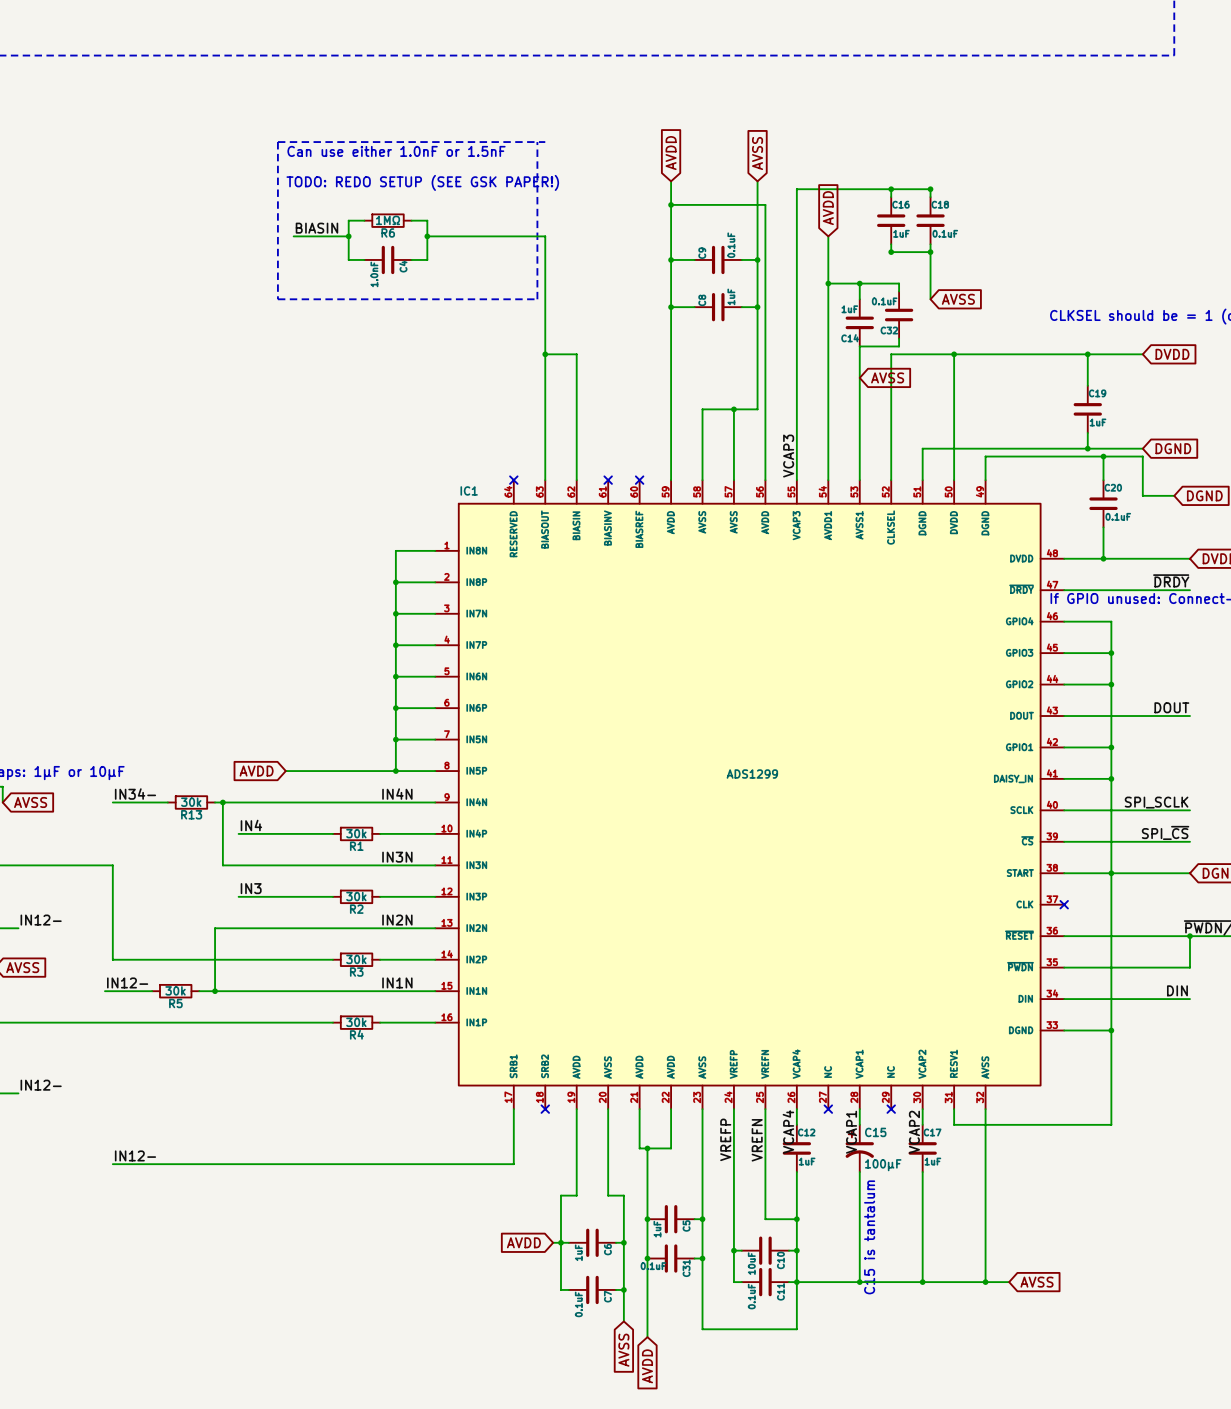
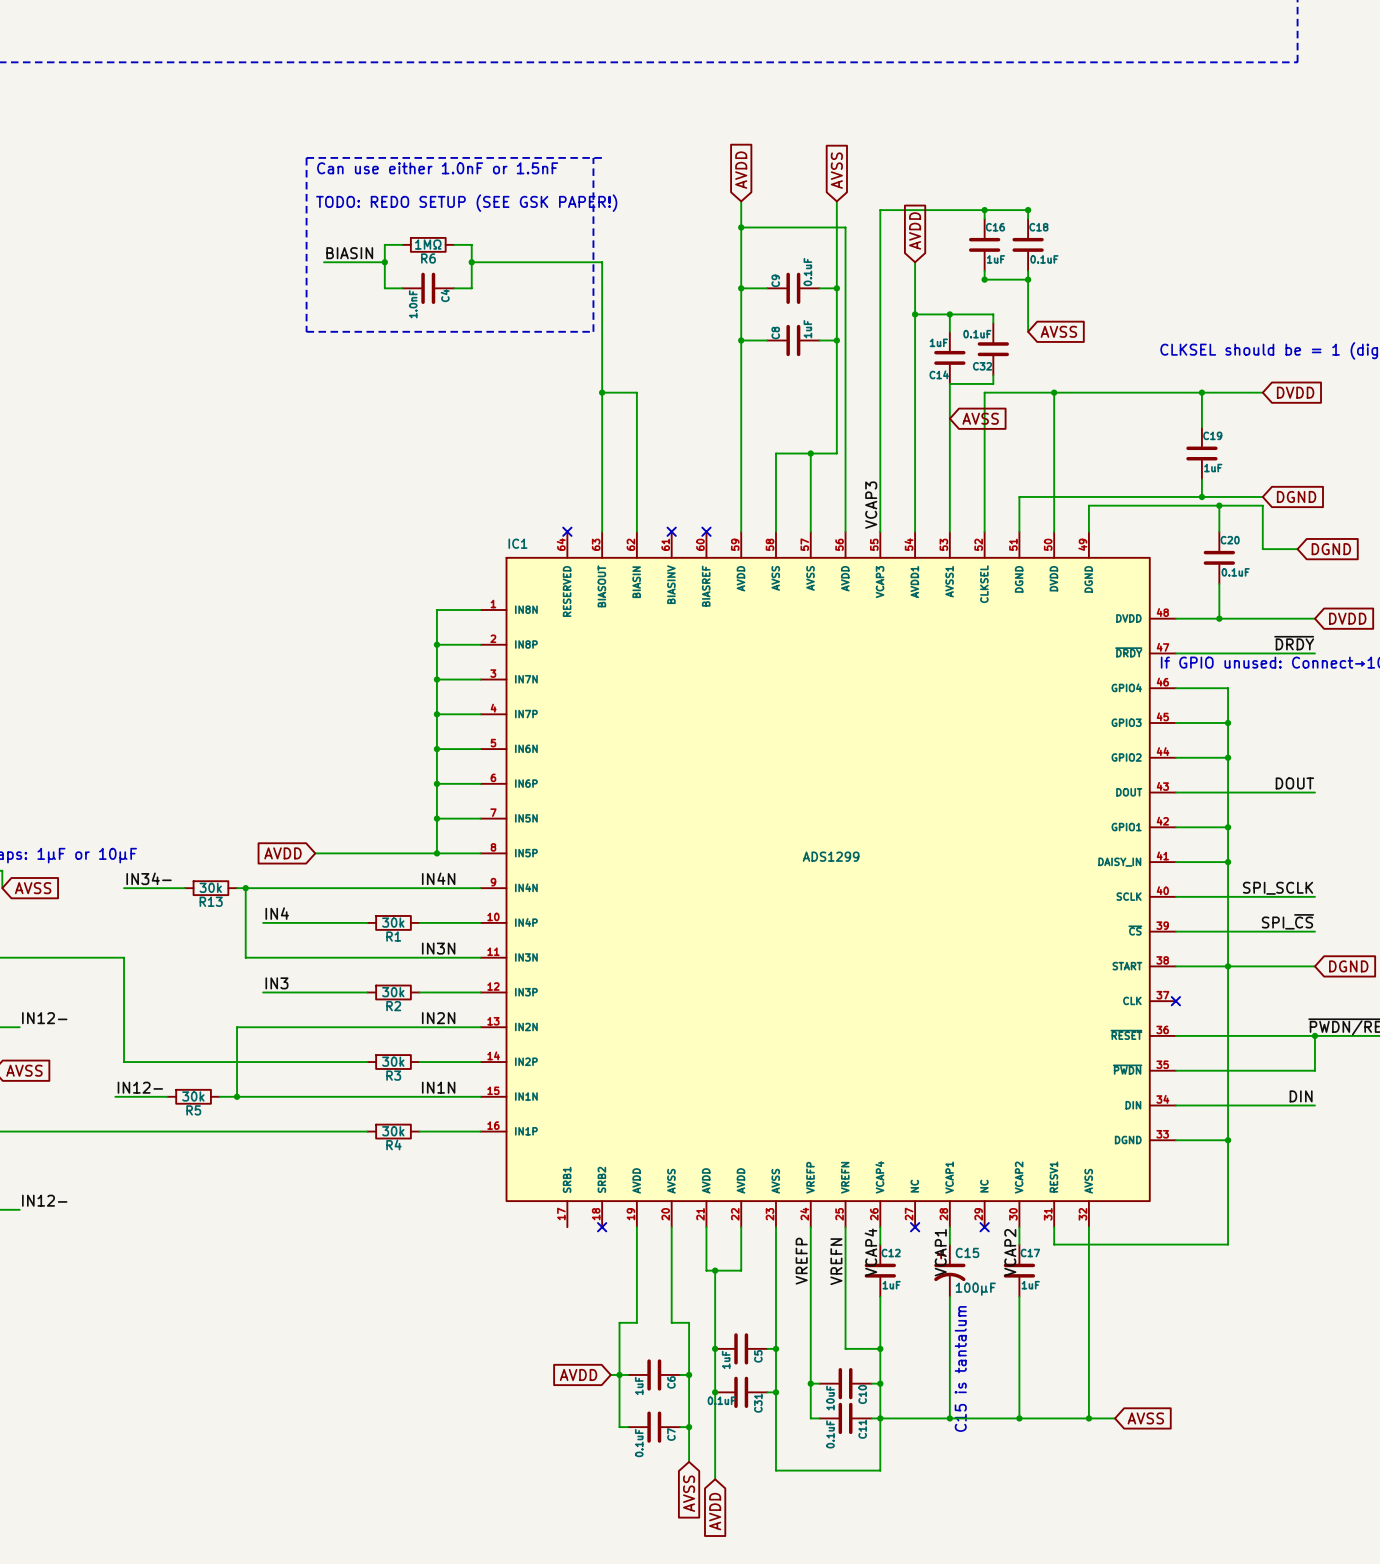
wire: (513, 1109) (513, 1164) (112, 1164) -> none
label: IN12- (135, 1155) -> none

